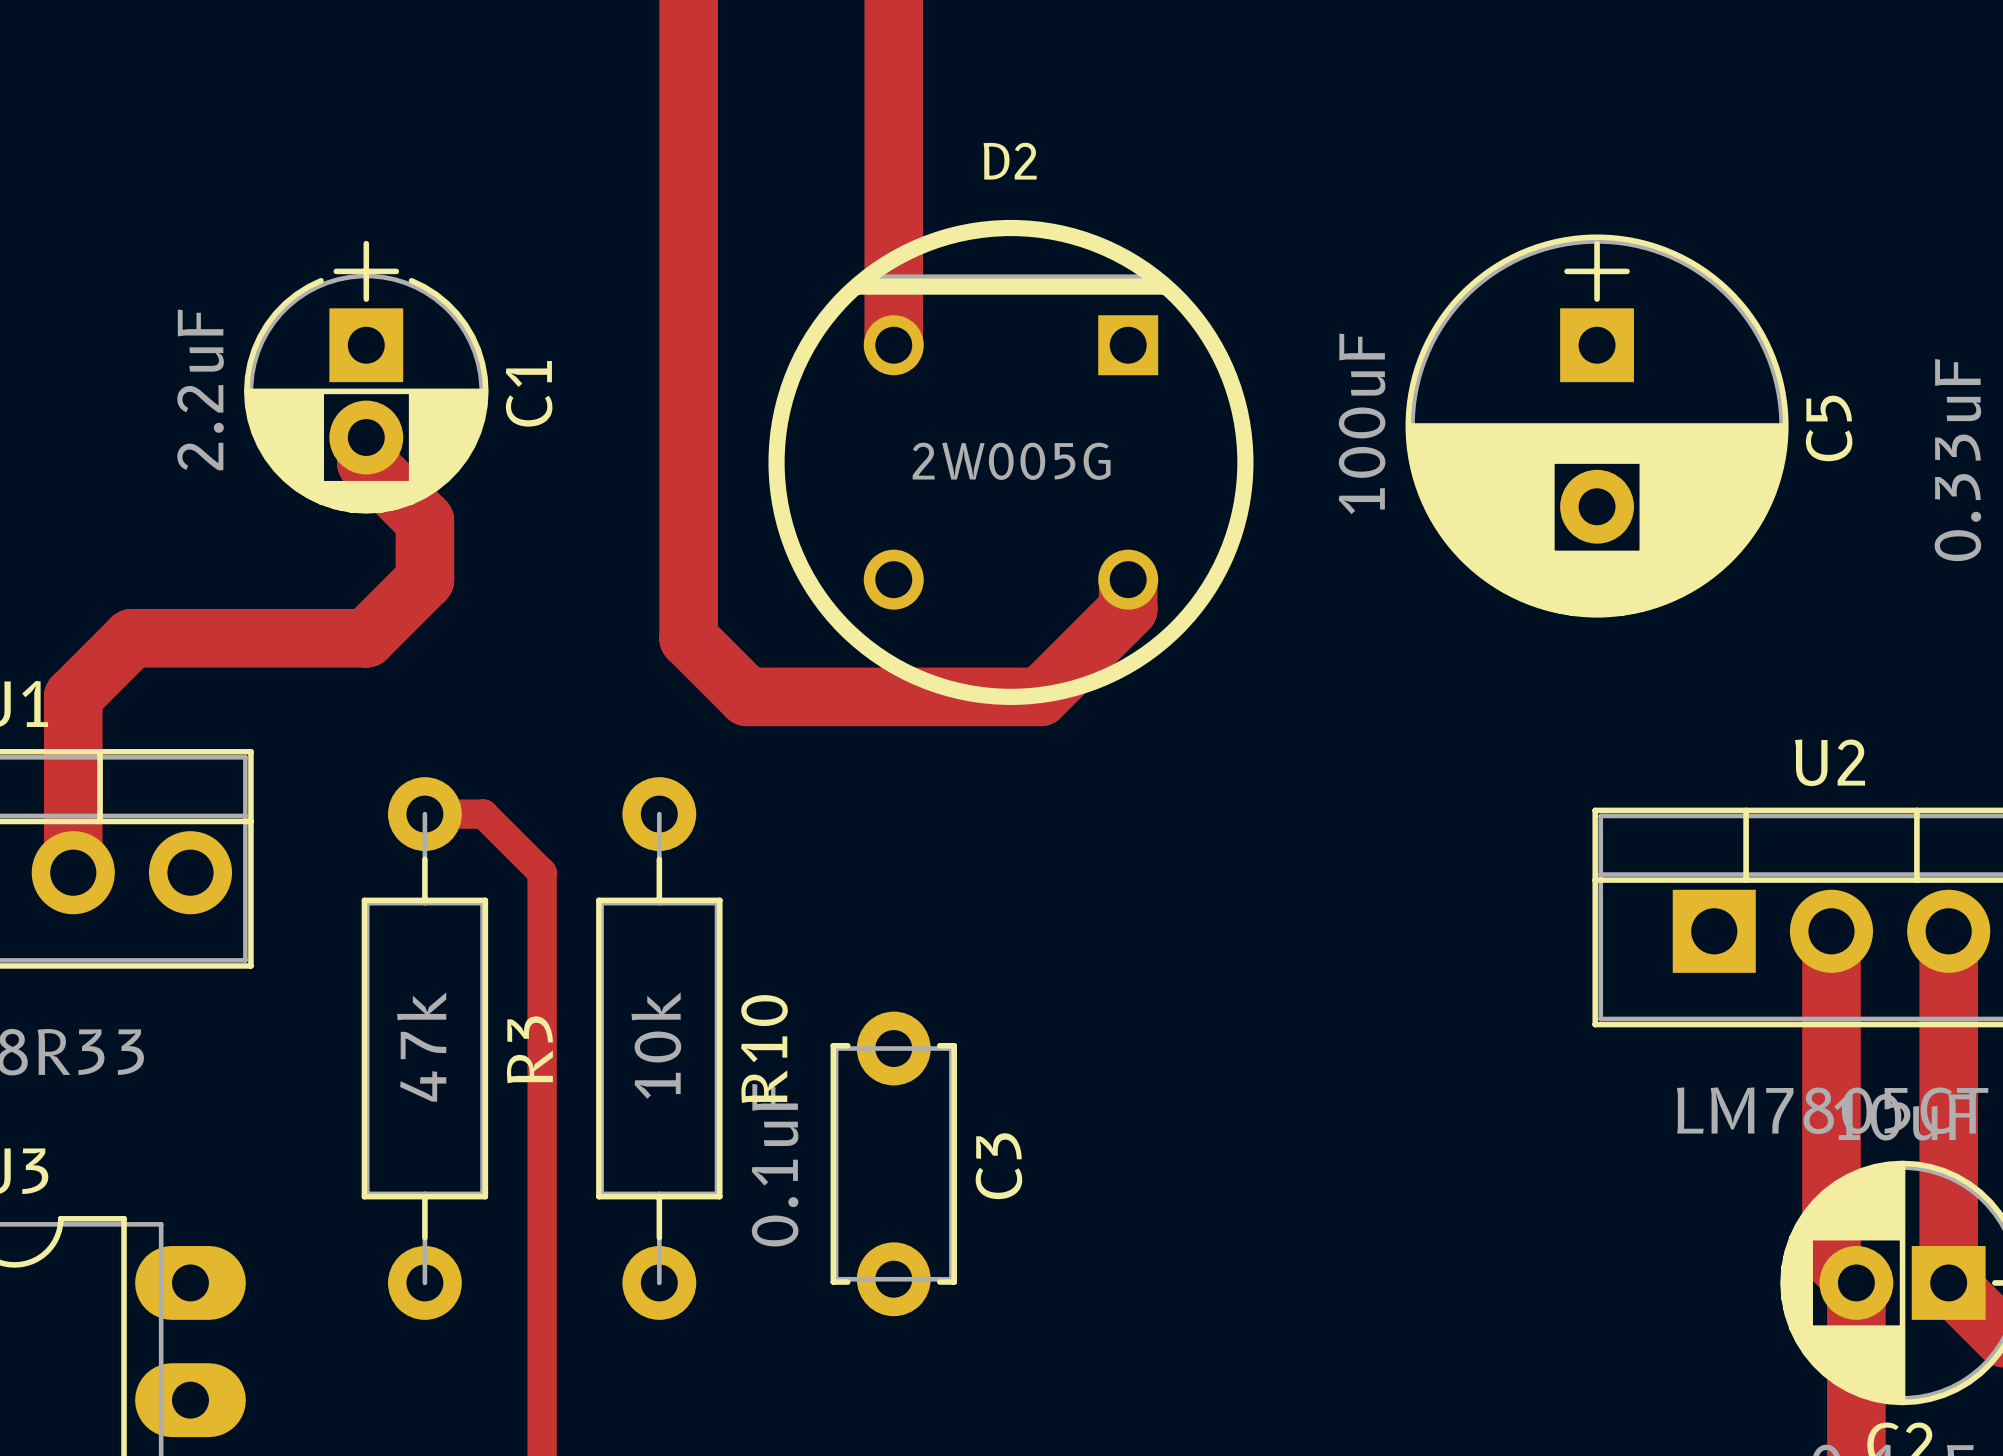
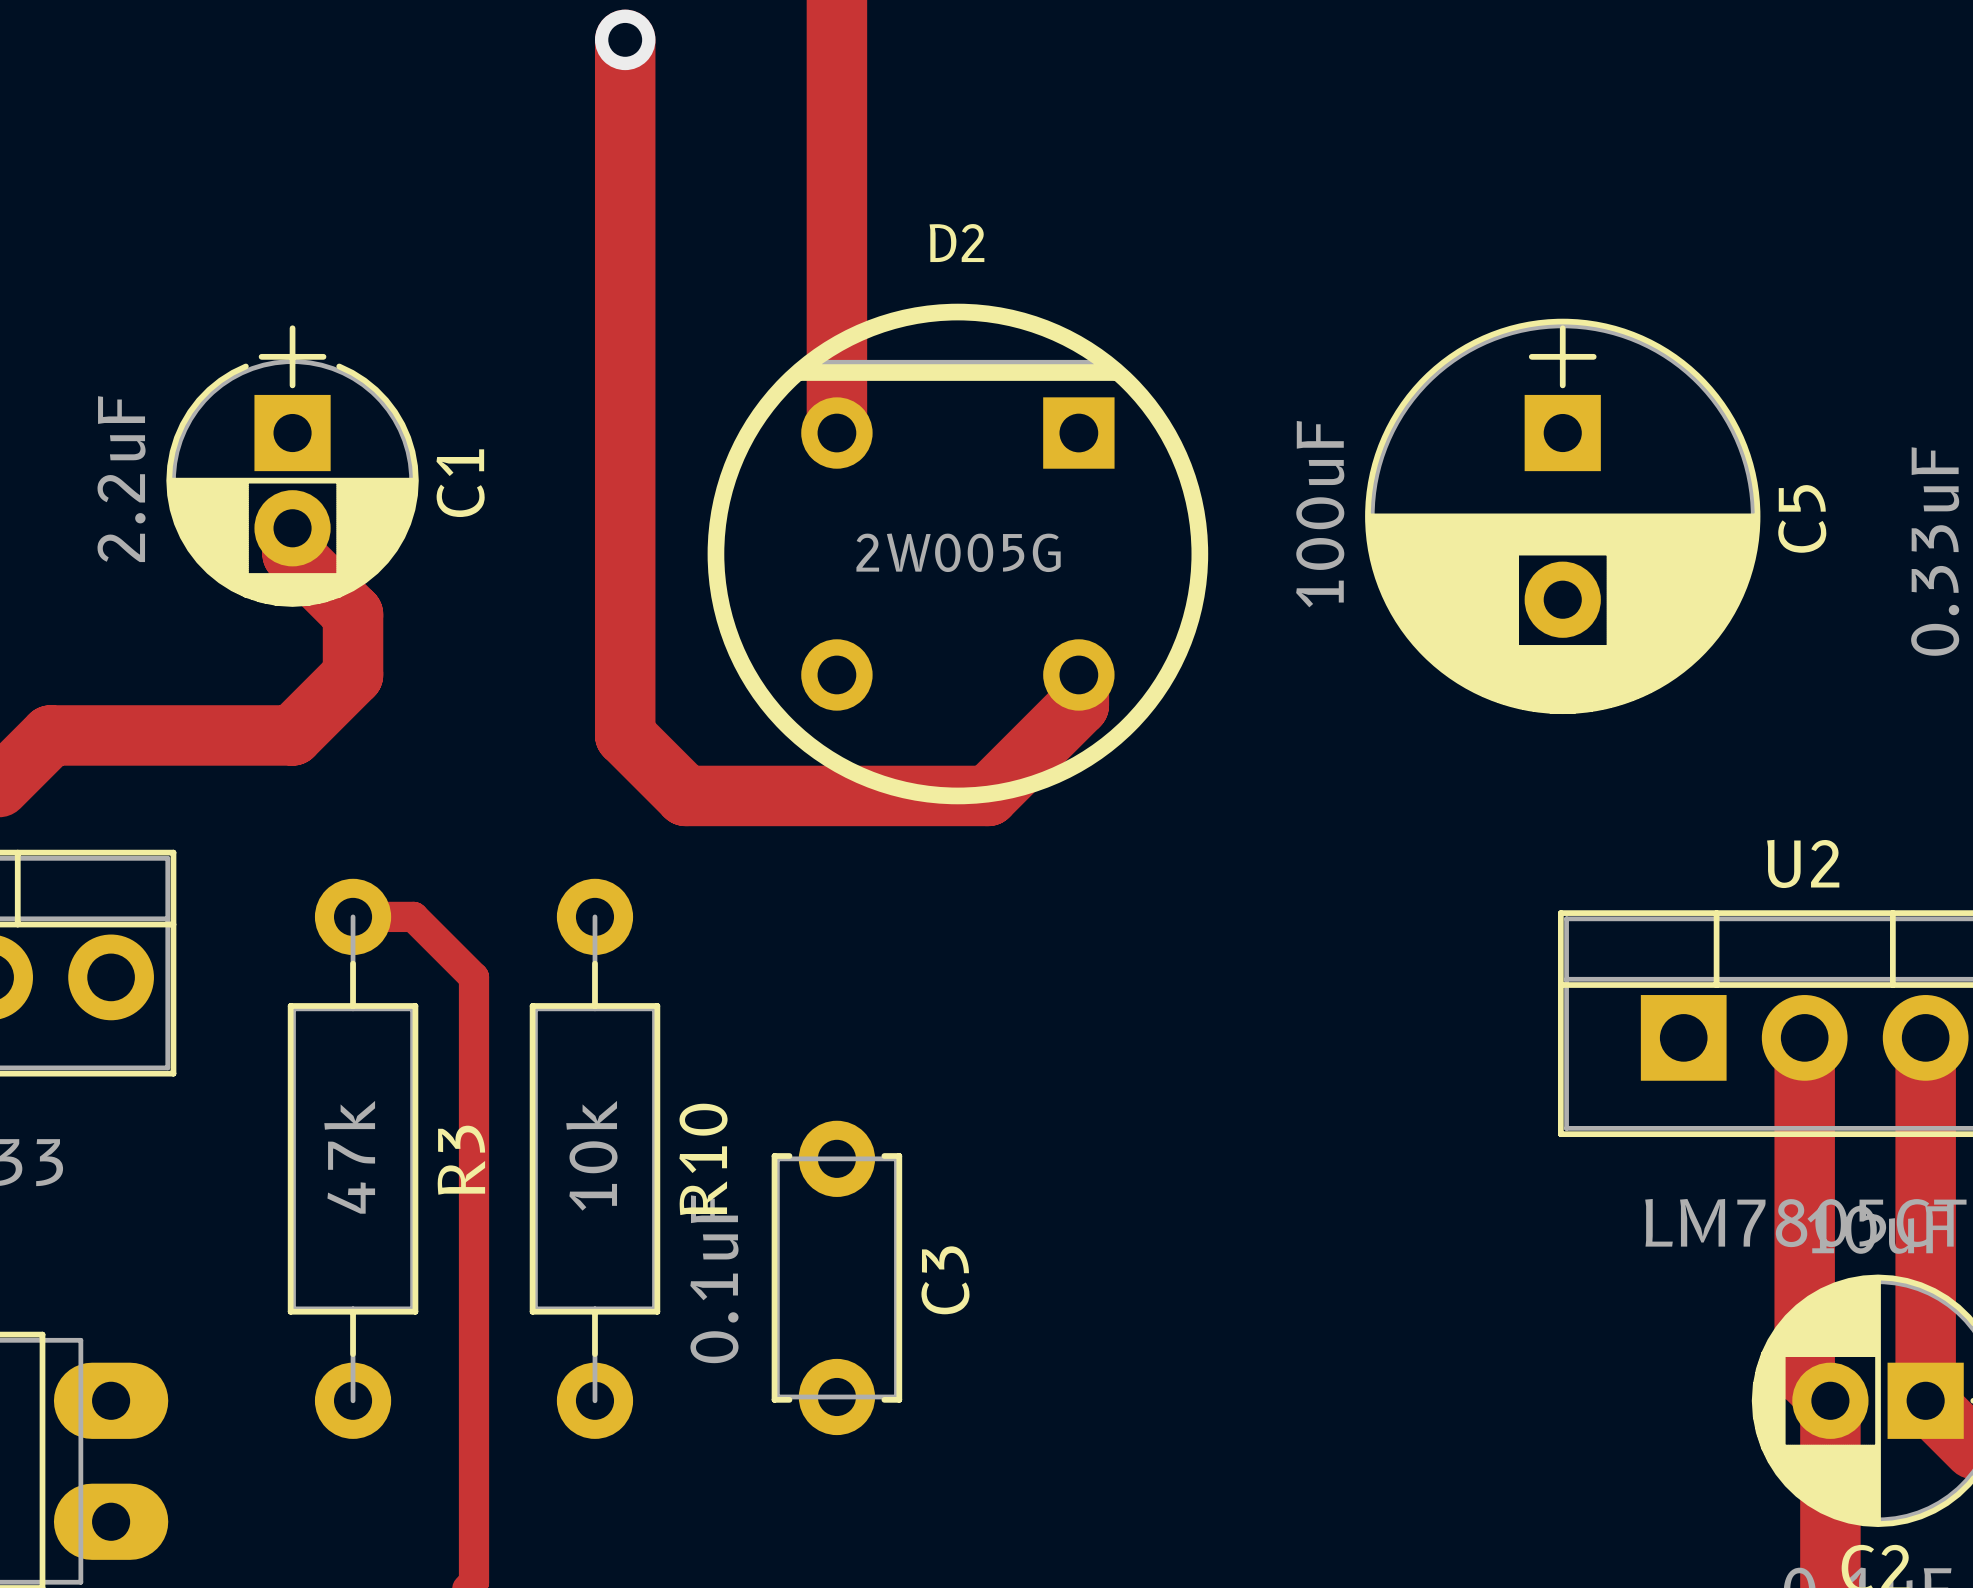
D2 footprint: [768, 219, 1254, 705] -> [707, 303, 1209, 805]

